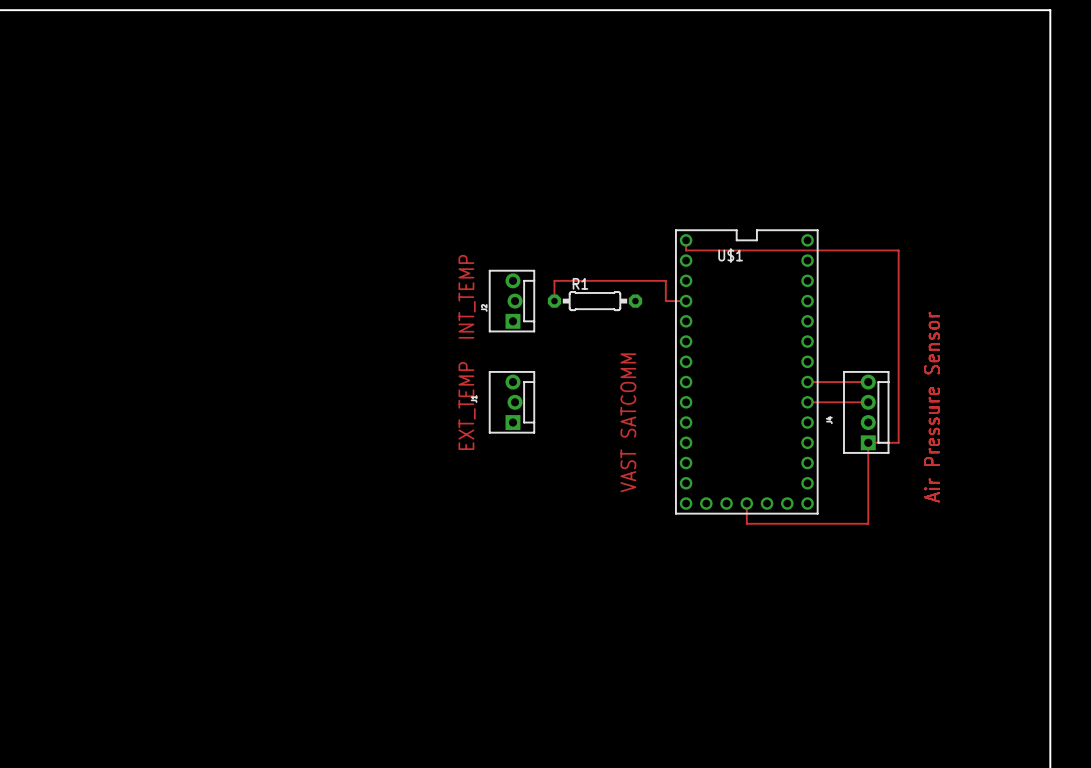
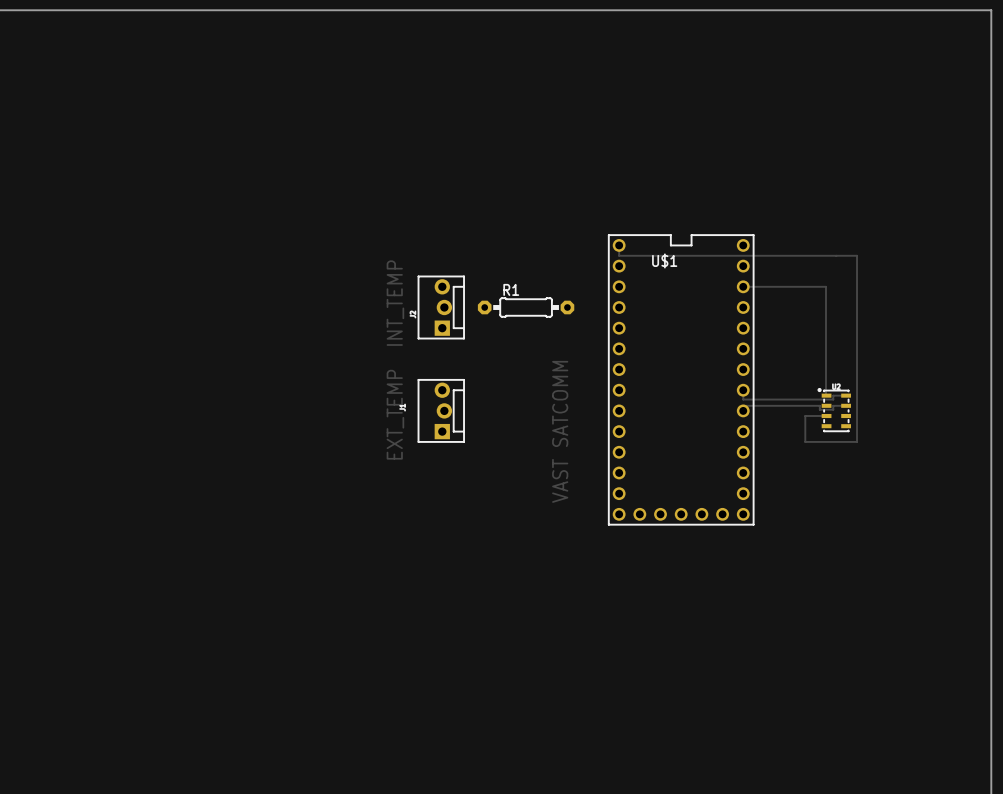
track: (898, 250) (898, 442) (868, 442) (868, 523) (746, 523) (746, 503) -> (836, 255) (857, 255) (857, 441) (805, 441) (805, 416) (826, 416)
track: none -> (743, 286) (825, 286) (826, 395)
track: (554, 301) (554, 280) (665, 280) (665, 301) (686, 301) -> none
track: (807, 382) (868, 382) -> (743, 390) (743, 399) (833, 399) (833, 395) (846, 395)
part: none -> (834, 410)
track: (807, 402) (868, 402) -> (743, 410) (743, 405) (819, 405) (819, 409) (833, 409) (833, 405) (846, 405)
text: Air Pressure Sensor (932, 407) -> none
part: (866, 412) -> none

